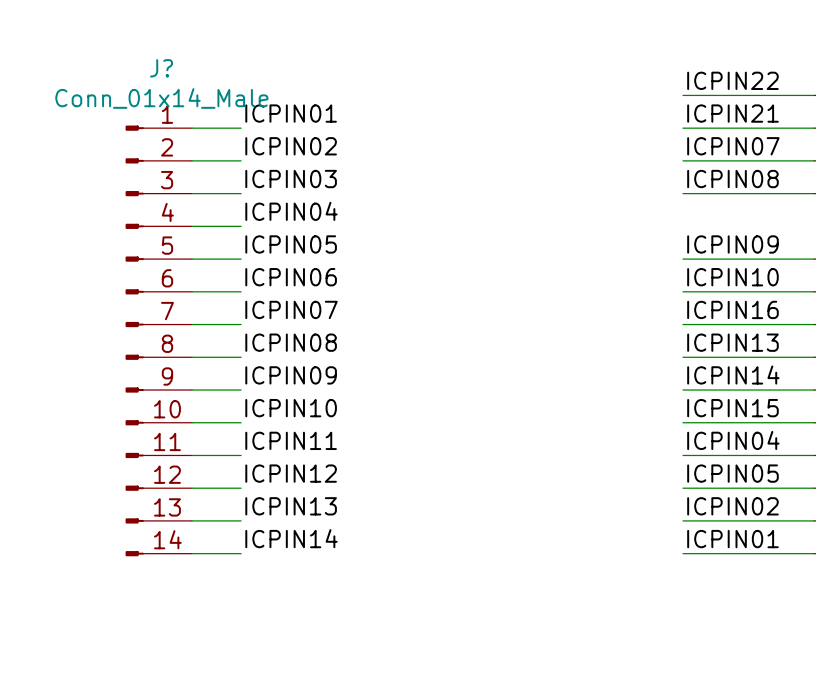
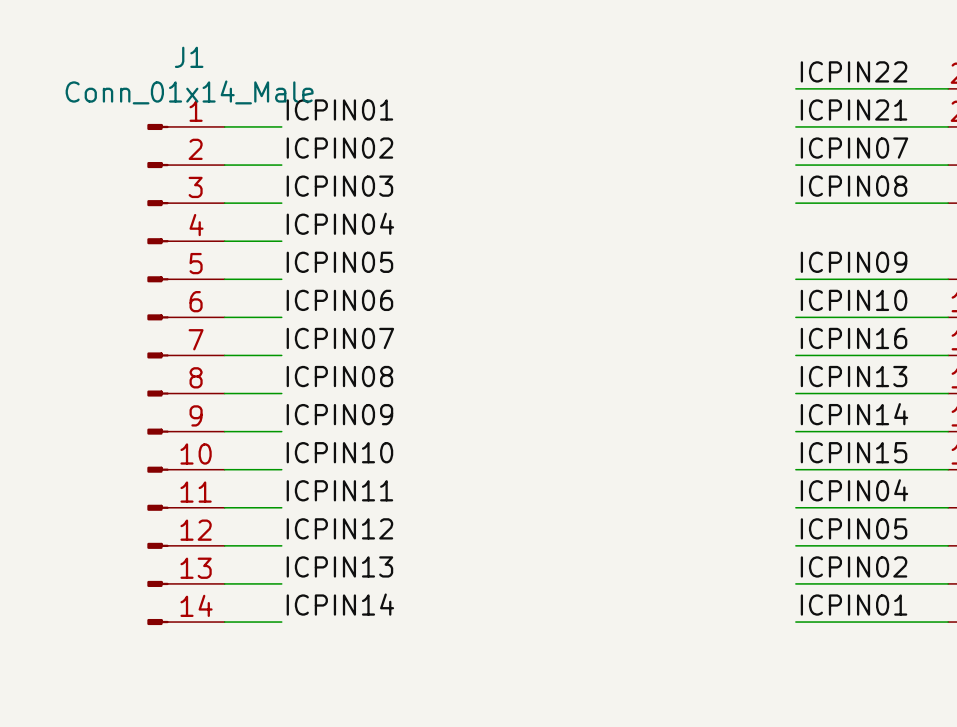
J? name: J? (161, 68) -> J1 (189, 57)

